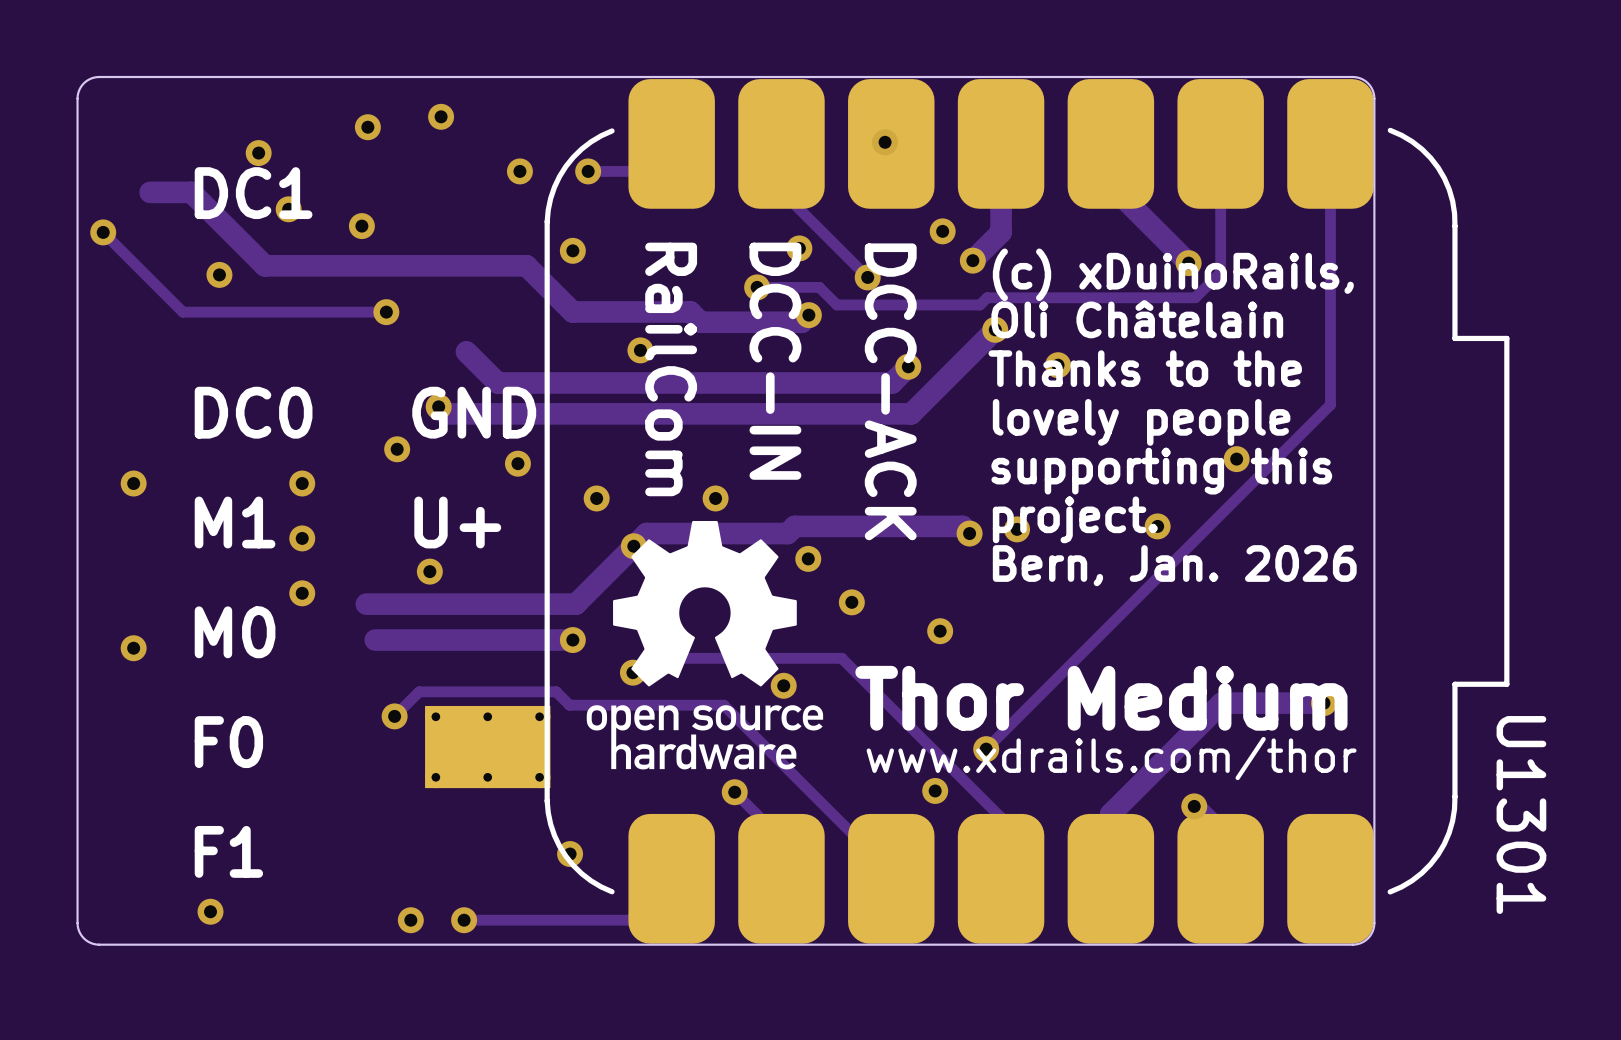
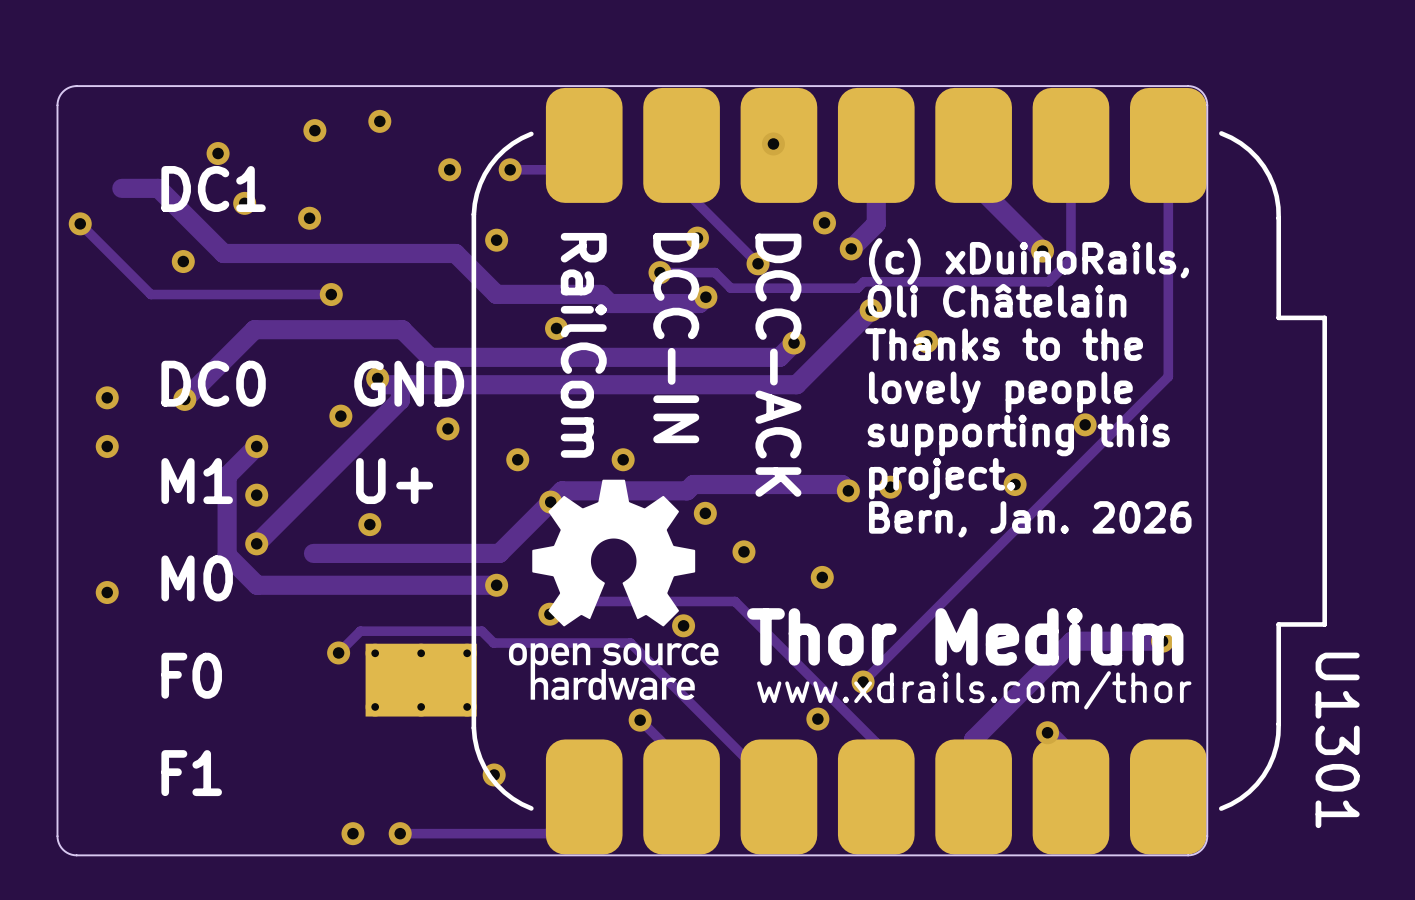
track: (466, 351) (497, 382) -> (184, 399) (254, 329) (402, 329) (429, 357)
track: none -> (400, 384) (400, 400) (256, 543)
via: none -> (107, 397)
via: none -> (184, 399)
track: none -> (256, 446) (227, 476) (227, 555) (257, 585) (321, 585)
via: (210, 911) -> none

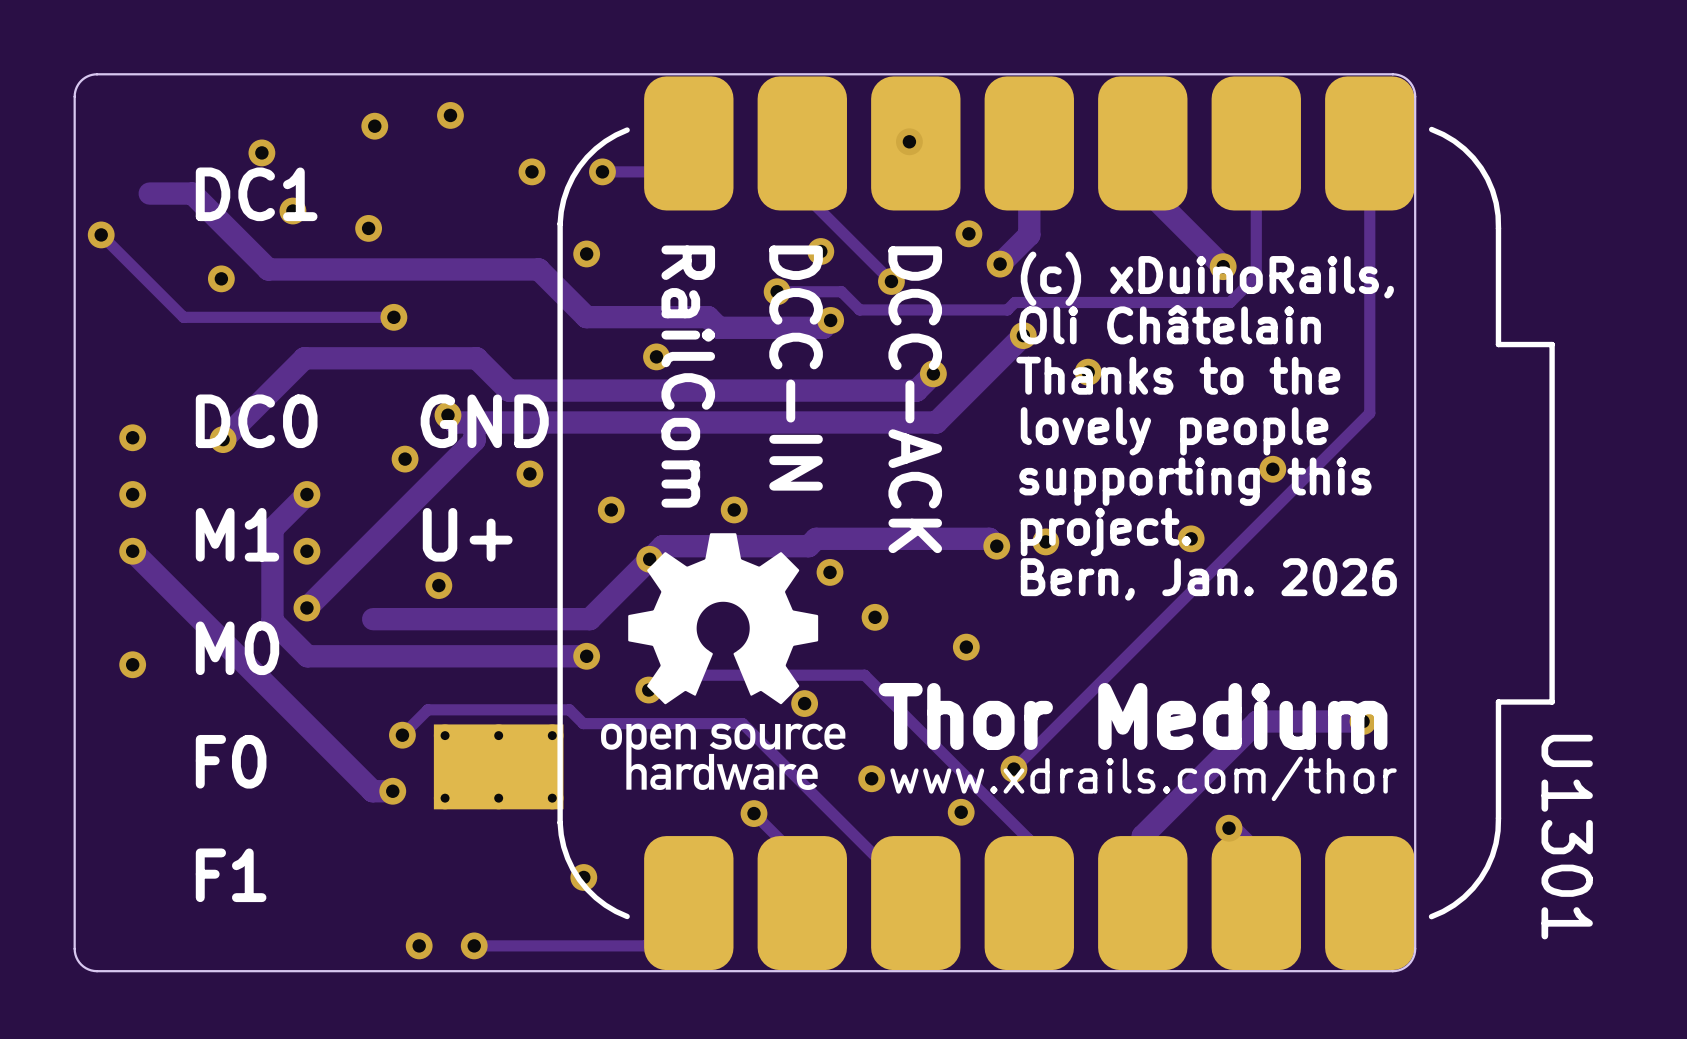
track: none -> (132, 551) (372, 791) (392, 791)
via: none -> (132, 551)
via: none -> (871, 778)
via: none -> (392, 791)

